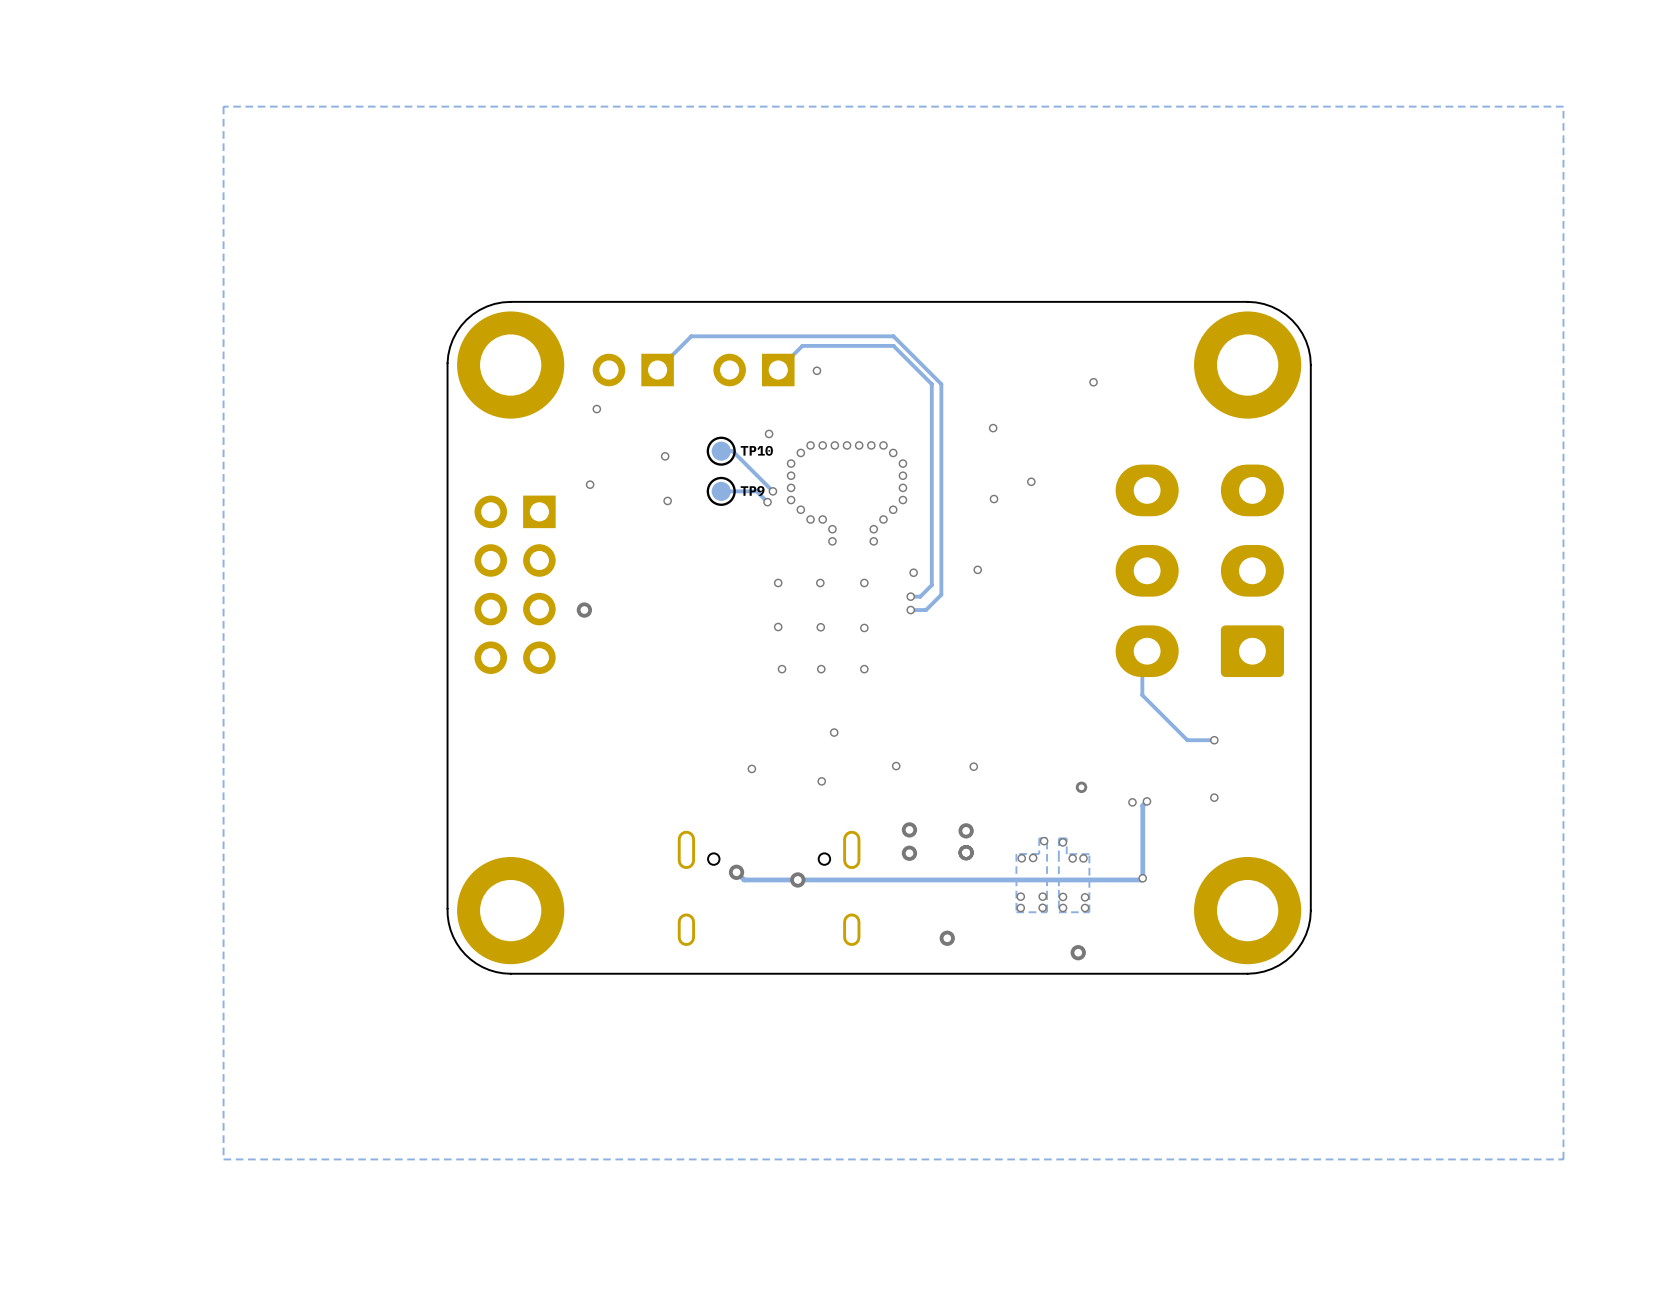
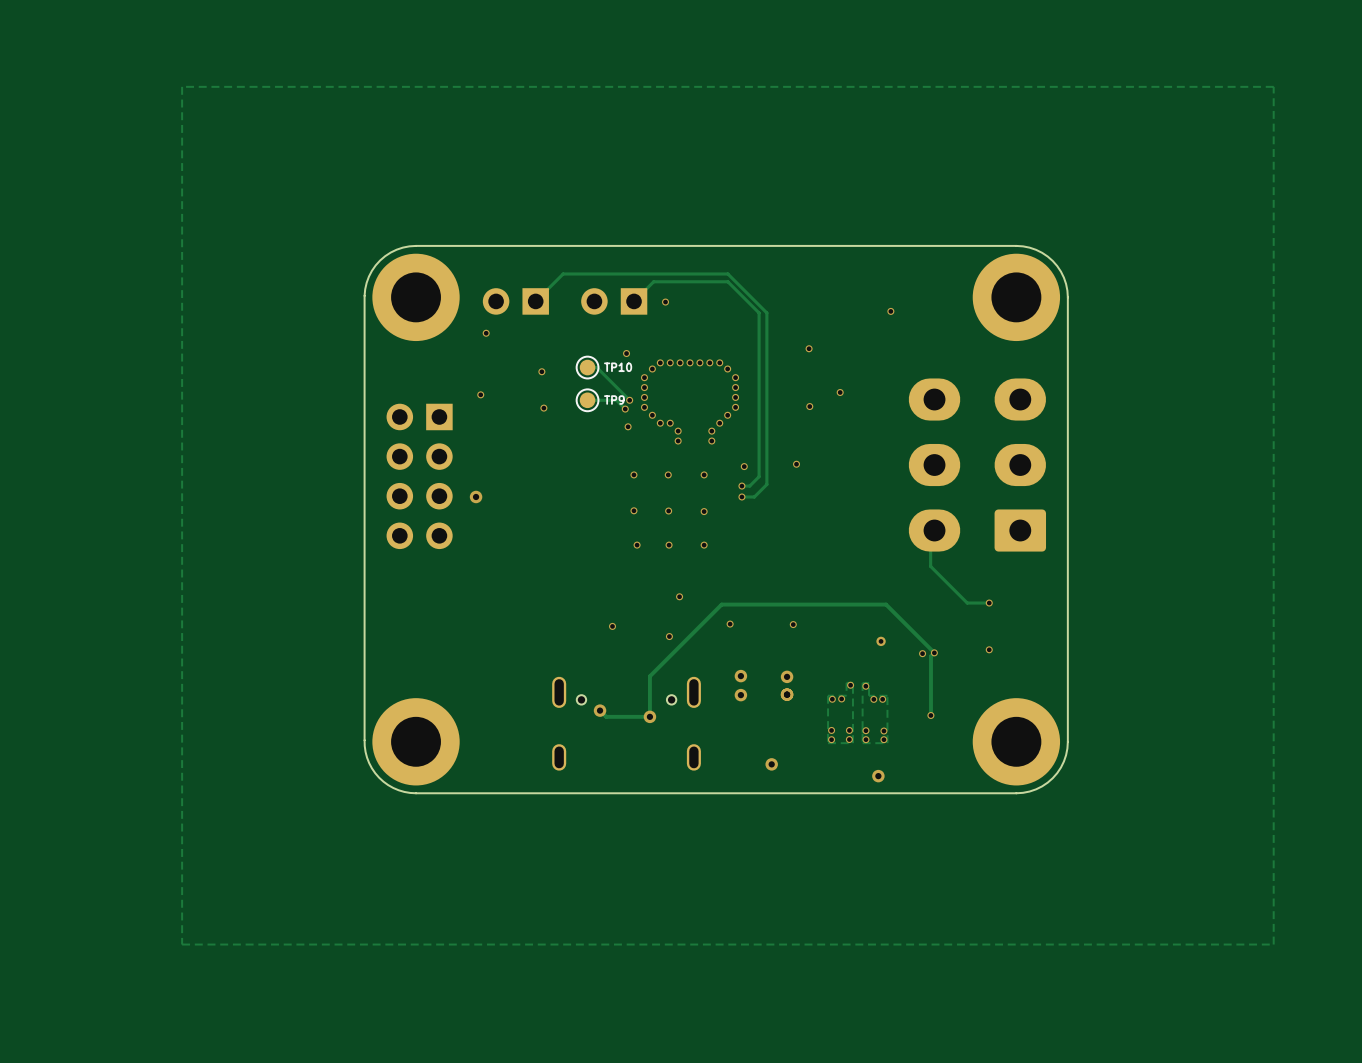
via: none -> (628, 426)
track: (1142, 878) (1141, 879) (797, 879) -> (934, 652) (886, 604) (721, 604) (649, 676) (649, 716)

